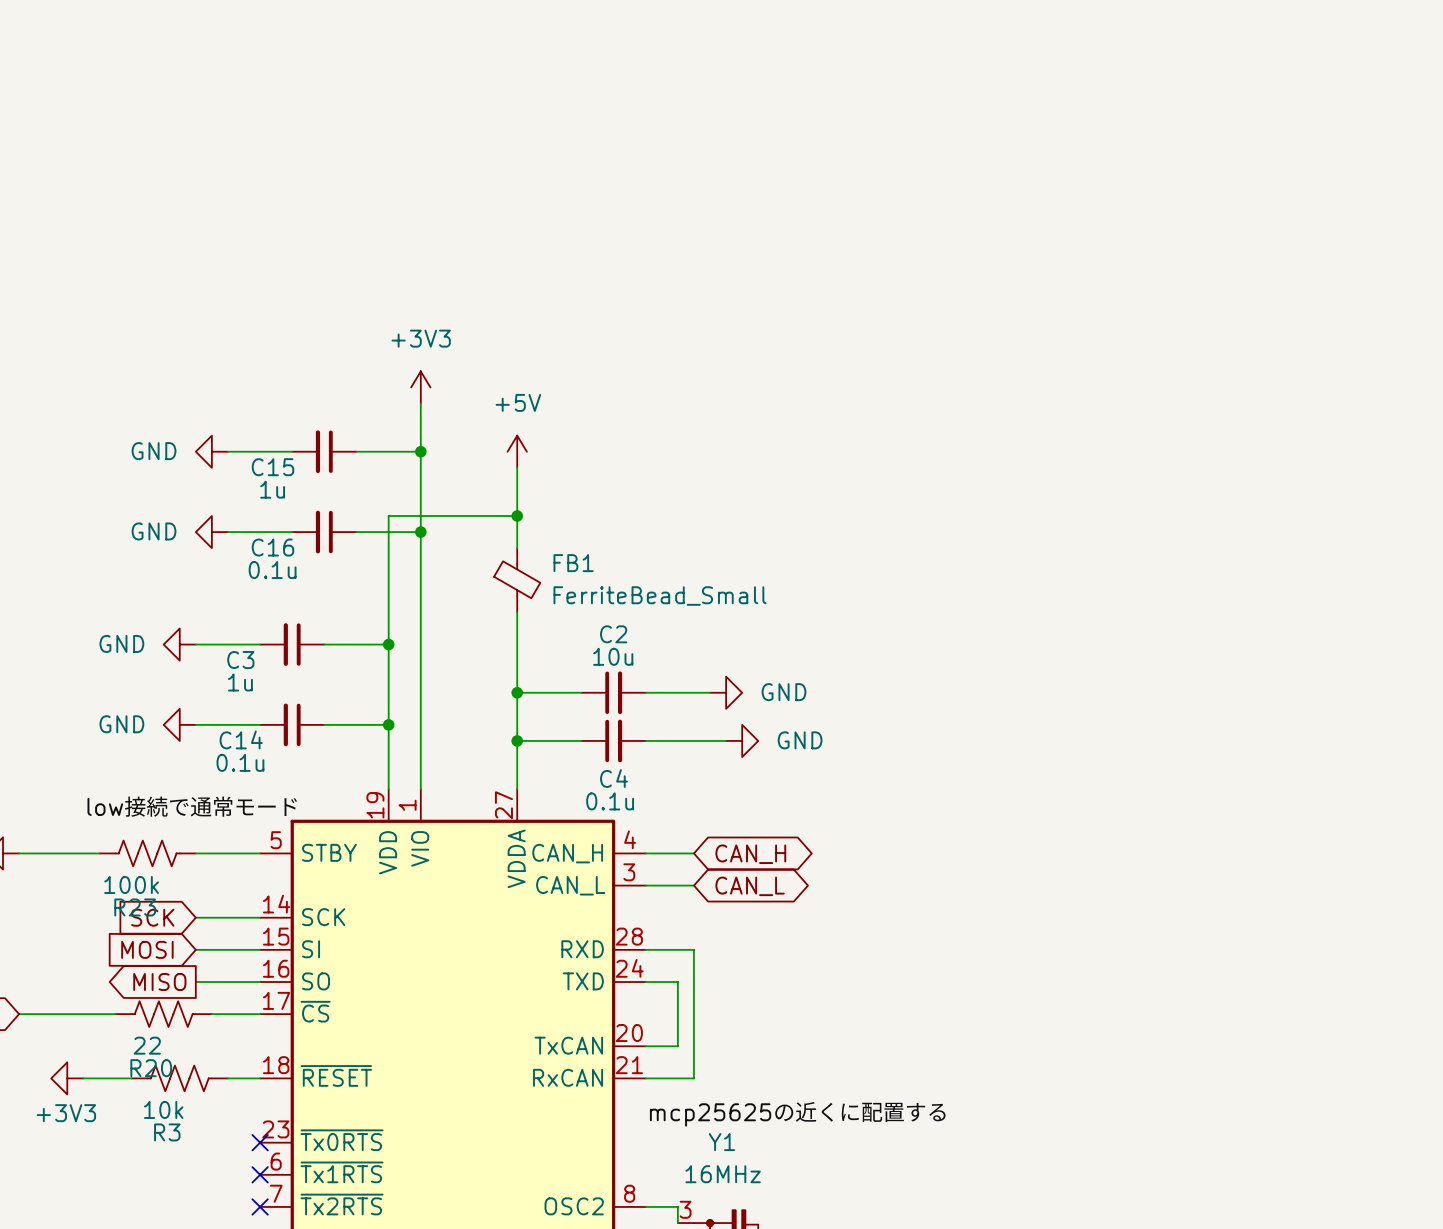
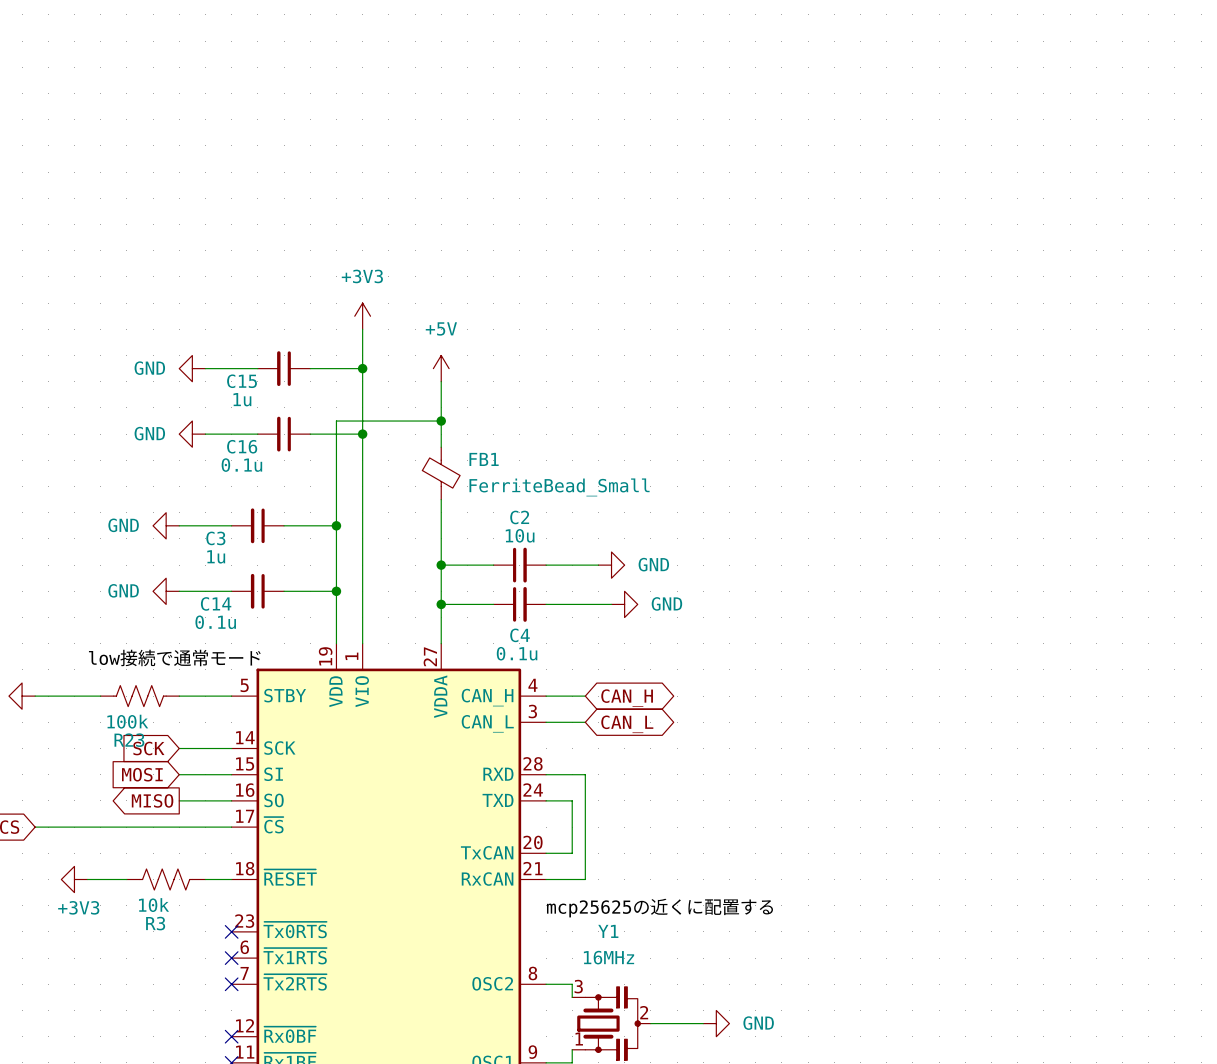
R20: 22 (163, 1014) -> none

